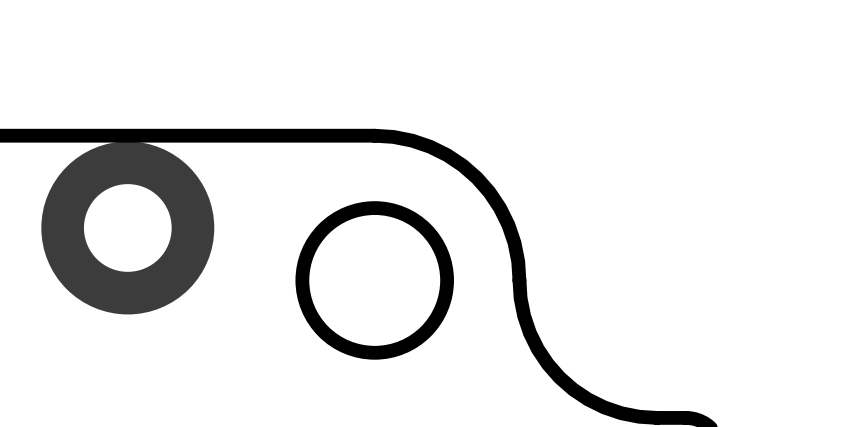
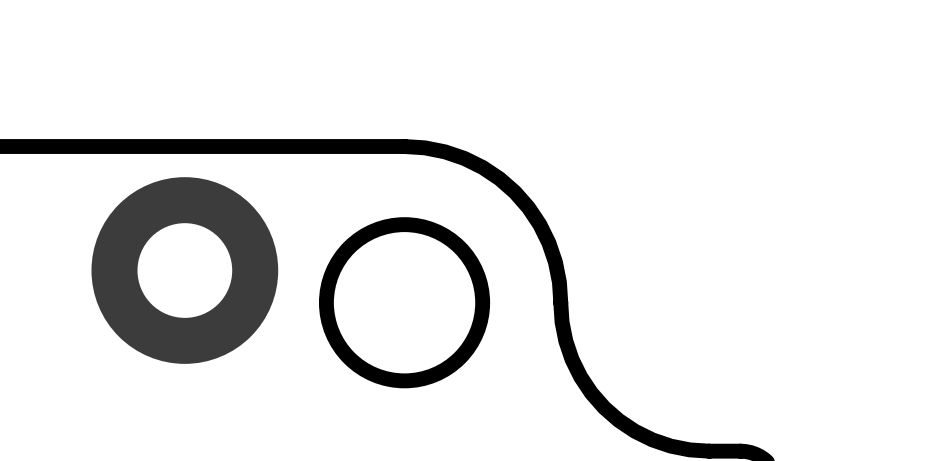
part position: (127, 227) -> (184, 270)

